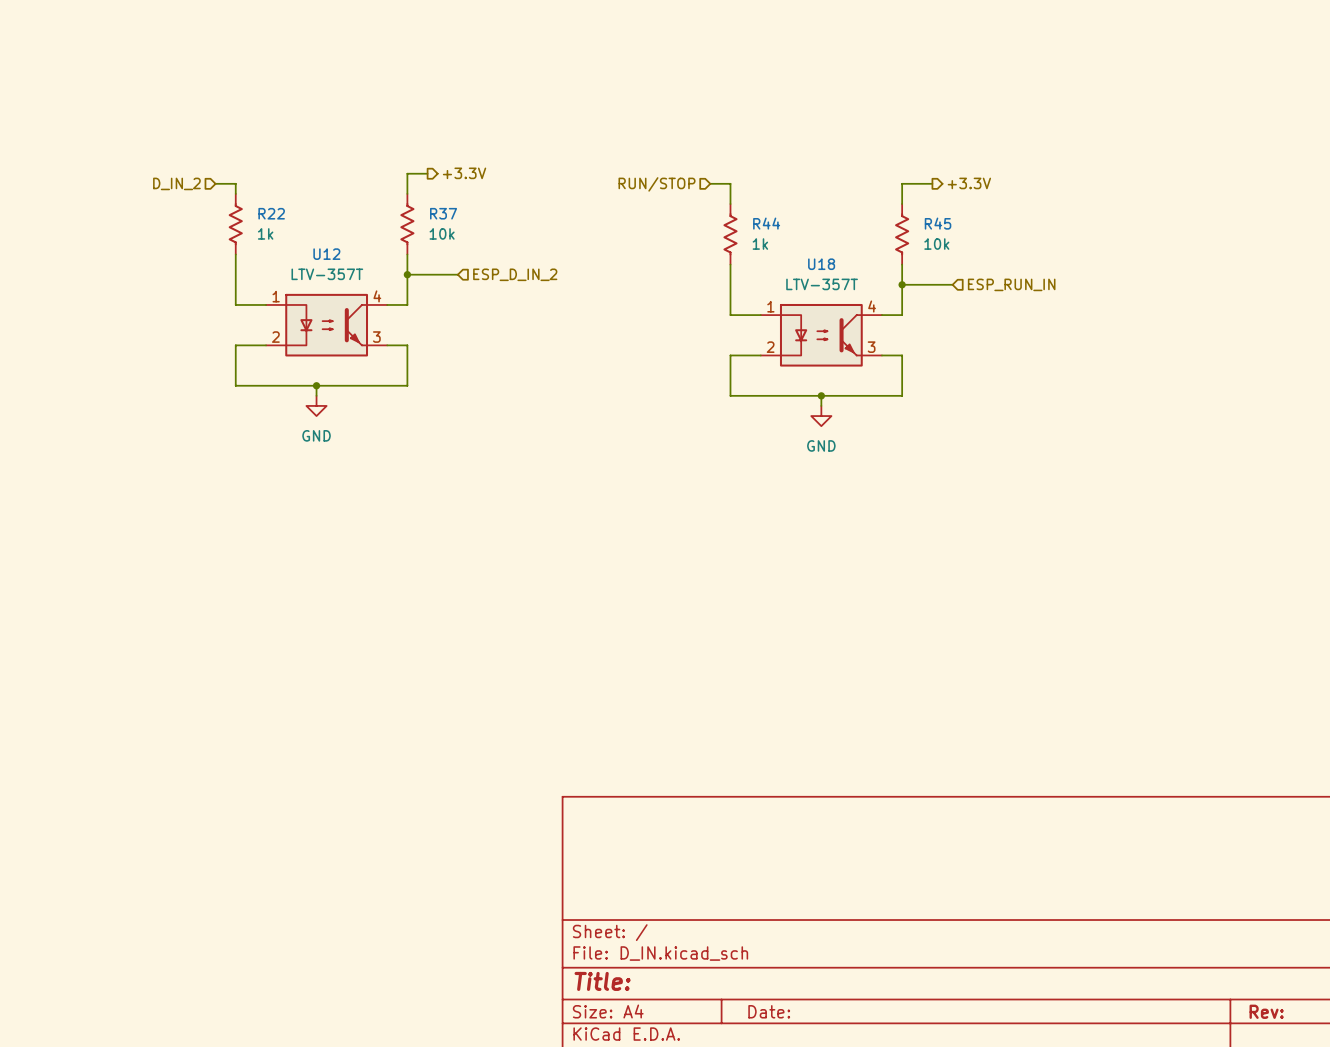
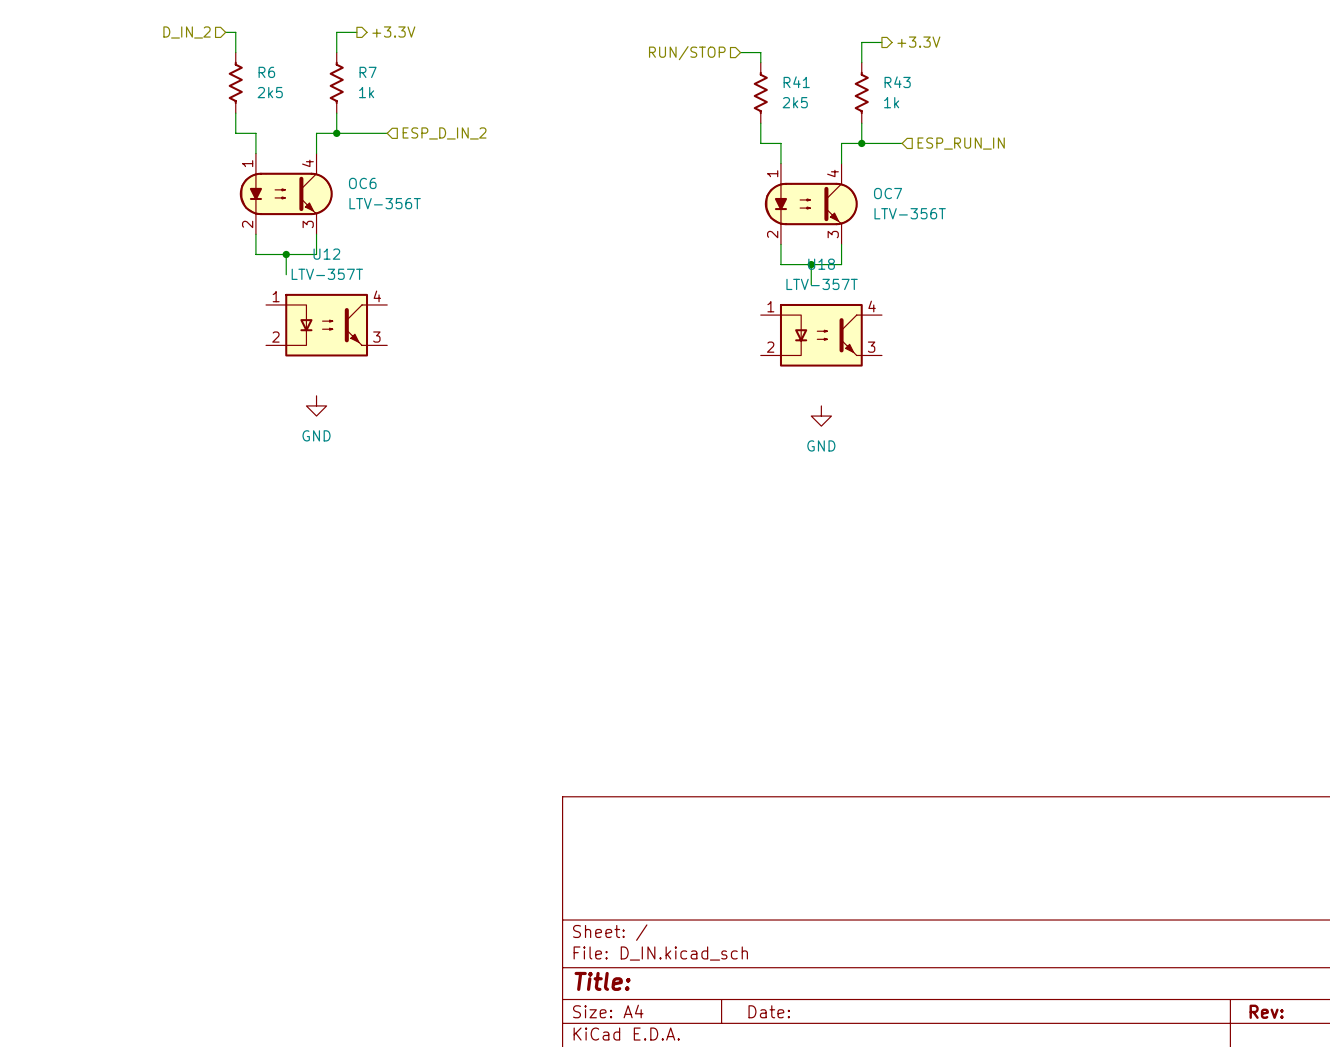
wire: none -> (225, 32) (235, 32) (235, 52)
wire: none -> (881, 42) (861, 42) (861, 62)
wire: none -> (740, 52) (760, 52) (760, 62)
R6: none -> 2k5 (235, 82)
R7: none -> 1k (336, 82)
R41: none -> 2k5 (760, 92)
R43: none -> 1k (861, 92)
wire: none -> (235, 113) (235, 133) (255, 133) (255, 153)
wire: none -> (336, 113) (336, 133)
wire: none -> (760, 123) (760, 143) (780, 143) (780, 163)
wire: none -> (861, 123) (861, 143)
junction: none -> (336, 133)
wire: none -> (387, 133) (316, 133) (316, 153)
junction: none -> (861, 143)
wire: none -> (902, 143) (841, 143) (841, 163)
wire: (427, 173) (407, 173) (407, 193) -> (356, 32) (336, 32) (336, 52)
hierarchical label position: +3.3V (464, 173) -> +3.3V (393, 31)
hierarchical label position: D_IN_2 (176, 183) -> D_IN_2 (187, 32)
wire: (215, 183) (235, 183) (235, 193) -> none
wire: (710, 183) (730, 183) (730, 204) -> none
wire: (932, 183) (902, 183) (902, 204) -> none
hierarchical label position: +3.3V (969, 183) -> +3.3V (918, 42)
hierarchical label position: RUN/STOP (657, 184) -> RUN/STOP (687, 53)
OC6: none -> LTV-356T (286, 193)
OC7: none -> LTV-356T (811, 204)
R22: 1k (235, 224) -> none
R37: 10k (407, 224) -> none
wire: none -> (255, 234) (255, 254) (316, 254) (316, 234)
R44: 1k (730, 234) -> none
R45: 10k (902, 234) -> none
wire: none -> (780, 244) (780, 264) (841, 264) (841, 244)
wire: (235, 254) (235, 304) (266, 304) -> none
wire: none -> (286, 254) (286, 274)
junction: none -> (286, 254)
wire: (407, 254) (407, 304) (387, 304) -> none
wire: (730, 264) (730, 315) (760, 315) -> none
wire: none -> (811, 264) (811, 284)
junction: none -> (811, 264)
wire: (902, 264) (902, 315) (881, 315) -> none
wire: (407, 274) (457, 274) -> none
junction: (407, 274) -> none
hierarchical label position: ESP_D_IN_2 (515, 274) -> ESP_D_IN_2 (444, 133)
wire: (902, 284) (952, 284) -> none
junction: (902, 284) -> none
hierarchical label position: ESP_RUN_IN (1011, 284) -> ESP_RUN_IN (961, 143)
wire: (266, 345) (235, 345) (235, 385) (407, 385) (407, 345) (387, 345) -> none
wire: (760, 355) (730, 355) (730, 395) (902, 395) (902, 355) (881, 355) -> none
wire: (316, 385) (316, 395) -> none
junction: (316, 385) -> none
wire: (821, 395) (821, 405) -> none
junction: (821, 395) -> none

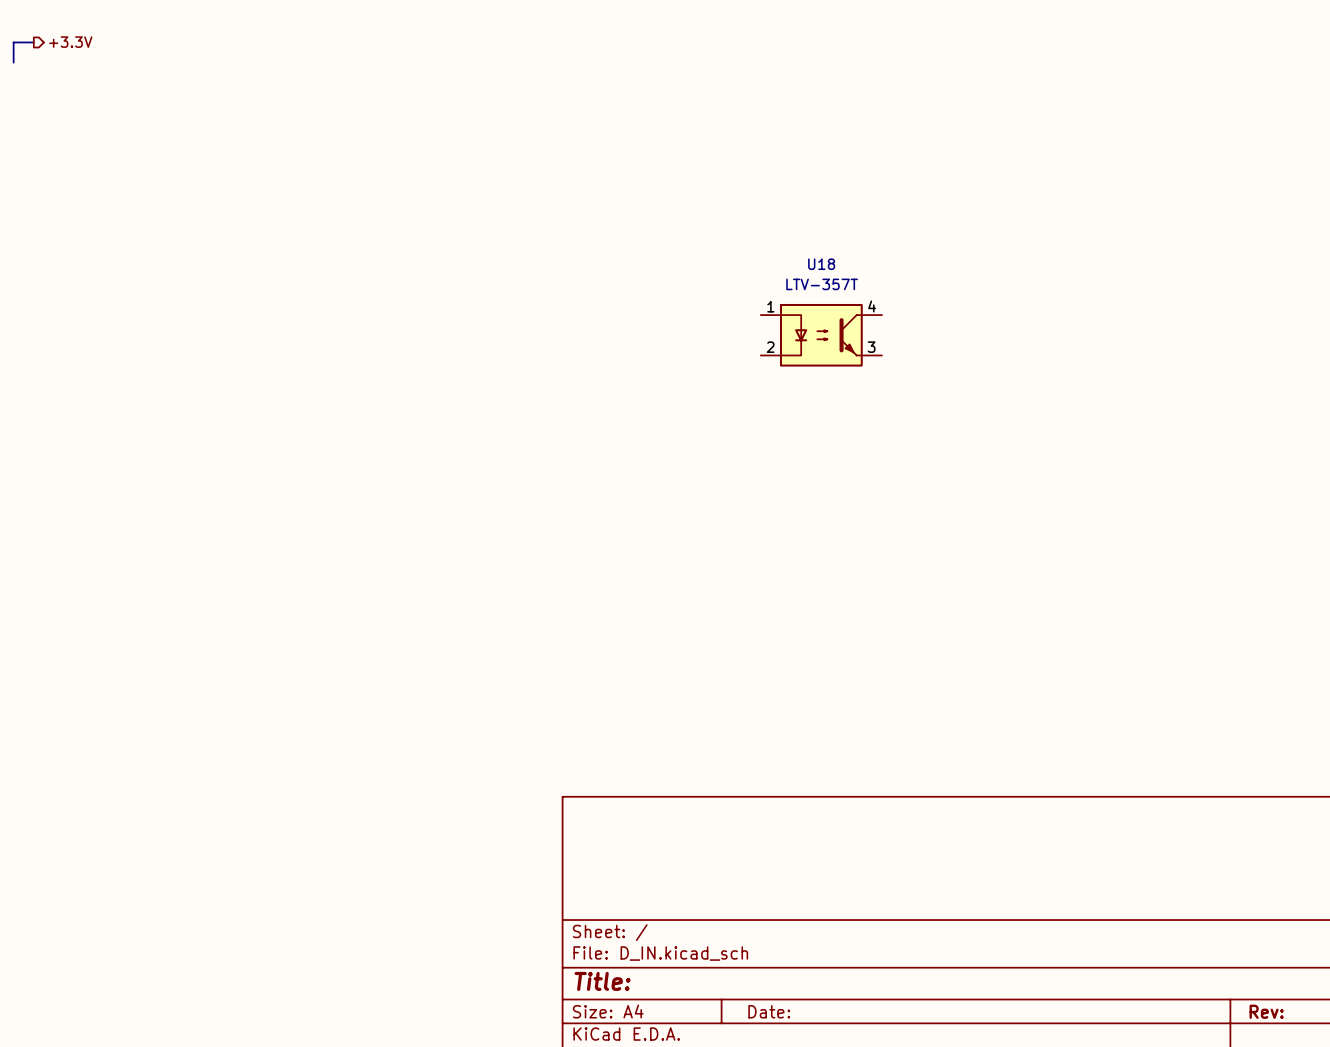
hierarchical label: +3.3V (393, 31) -> none
hierarchical label: D_IN_2 (187, 32) -> none
wire: (225, 32) (235, 32) (235, 52) -> none
wire: (356, 32) (336, 32) (336, 52) -> none
wire: none -> (33, 42) (13, 42) (13, 62)
hierarchical label: none -> +3.3V (70, 42)
wire: (881, 42) (861, 42) (861, 62) -> none
hierarchical label: +3.3V (918, 42) -> none
wire: (740, 52) (760, 52) (760, 62) -> none
hierarchical label: RUN/STOP (687, 53) -> none
R6: 2k5 (235, 82) -> none
R7: 1k (336, 82) -> none
R41: 2k5 (760, 92) -> none
R43: 1k (861, 92) -> none
wire: (235, 113) (235, 133) (255, 133) (255, 153) -> none
wire: (336, 113) (336, 133) -> none
wire: (760, 123) (760, 143) (780, 143) (780, 163) -> none
wire: (861, 123) (861, 143) -> none
junction: (336, 133) -> none
wire: (387, 133) (316, 133) (316, 153) -> none
hierarchical label: ESP_D_IN_2 (444, 133) -> none
junction: (861, 143) -> none
wire: (902, 143) (841, 143) (841, 163) -> none
hierarchical label: ESP_RUN_IN (961, 143) -> none
OC6: LTV-356T (286, 193) -> none
OC7: LTV-356T (811, 204) -> none
wire: (255, 234) (255, 254) (316, 254) (316, 234) -> none
wire: (780, 244) (780, 264) (841, 264) (841, 244) -> none
wire: (286, 254) (286, 274) -> none
junction: (286, 254) -> none
wire: (811, 264) (811, 284) -> none
junction: (811, 264) -> none
U12: LTV-357T (326, 325) -> none
power symbol: GND (316, 405) -> none
power symbol: GND (821, 416) -> none

